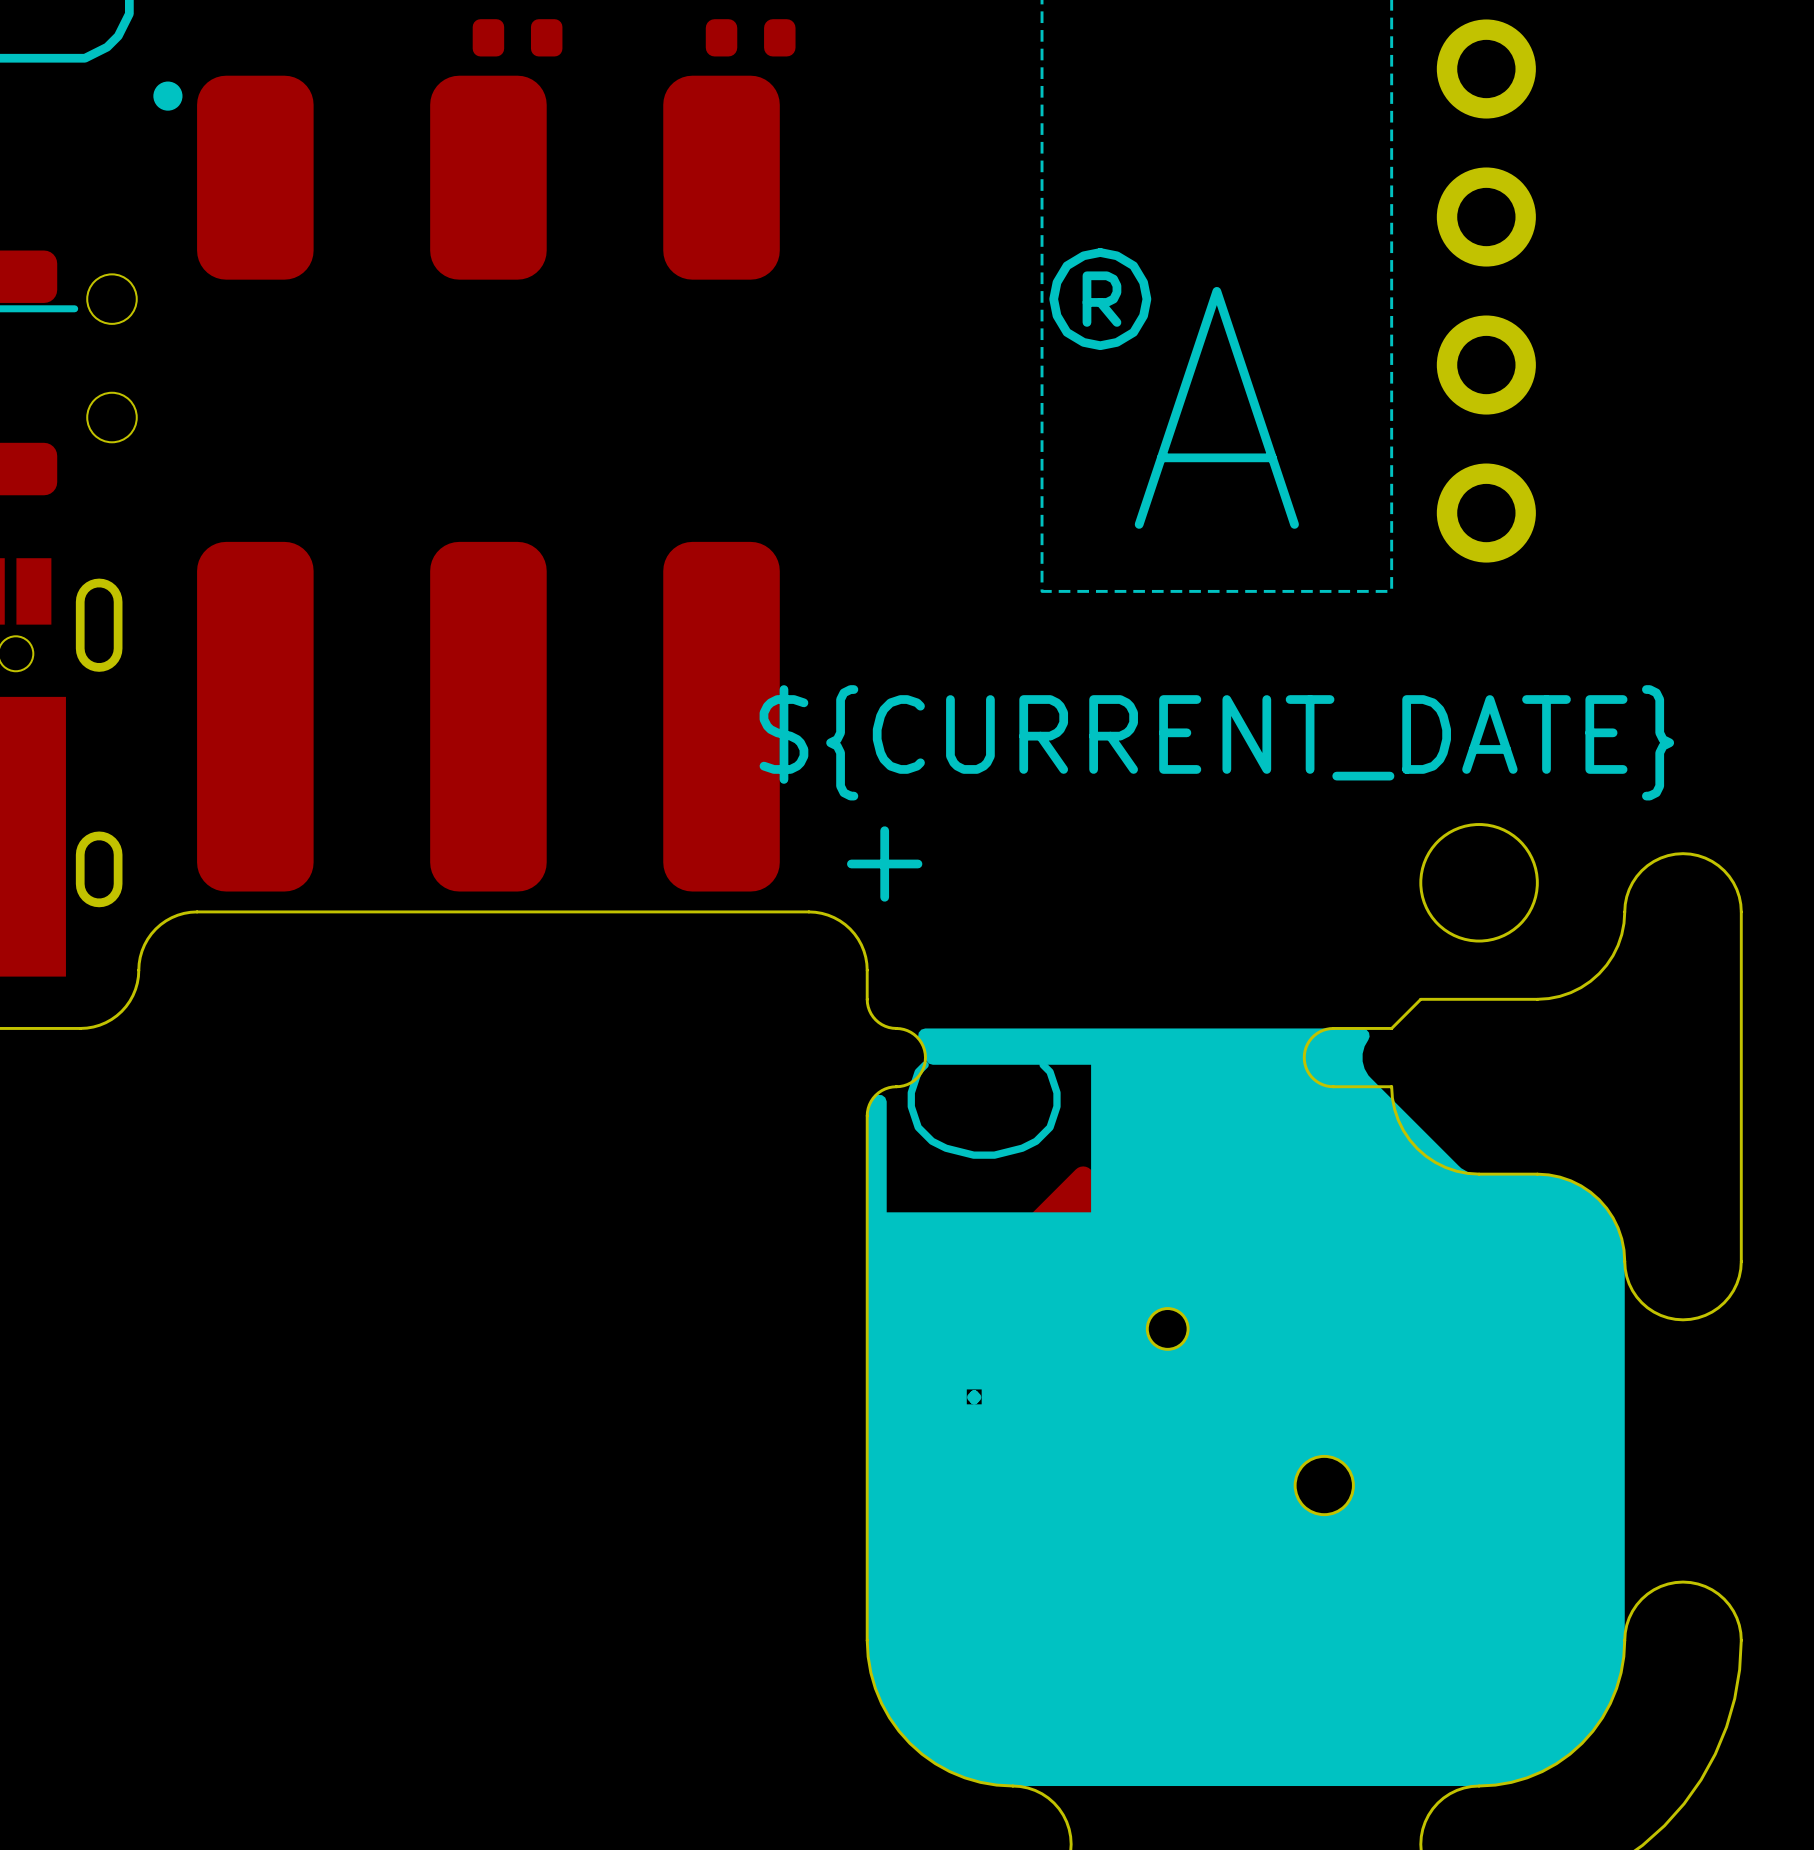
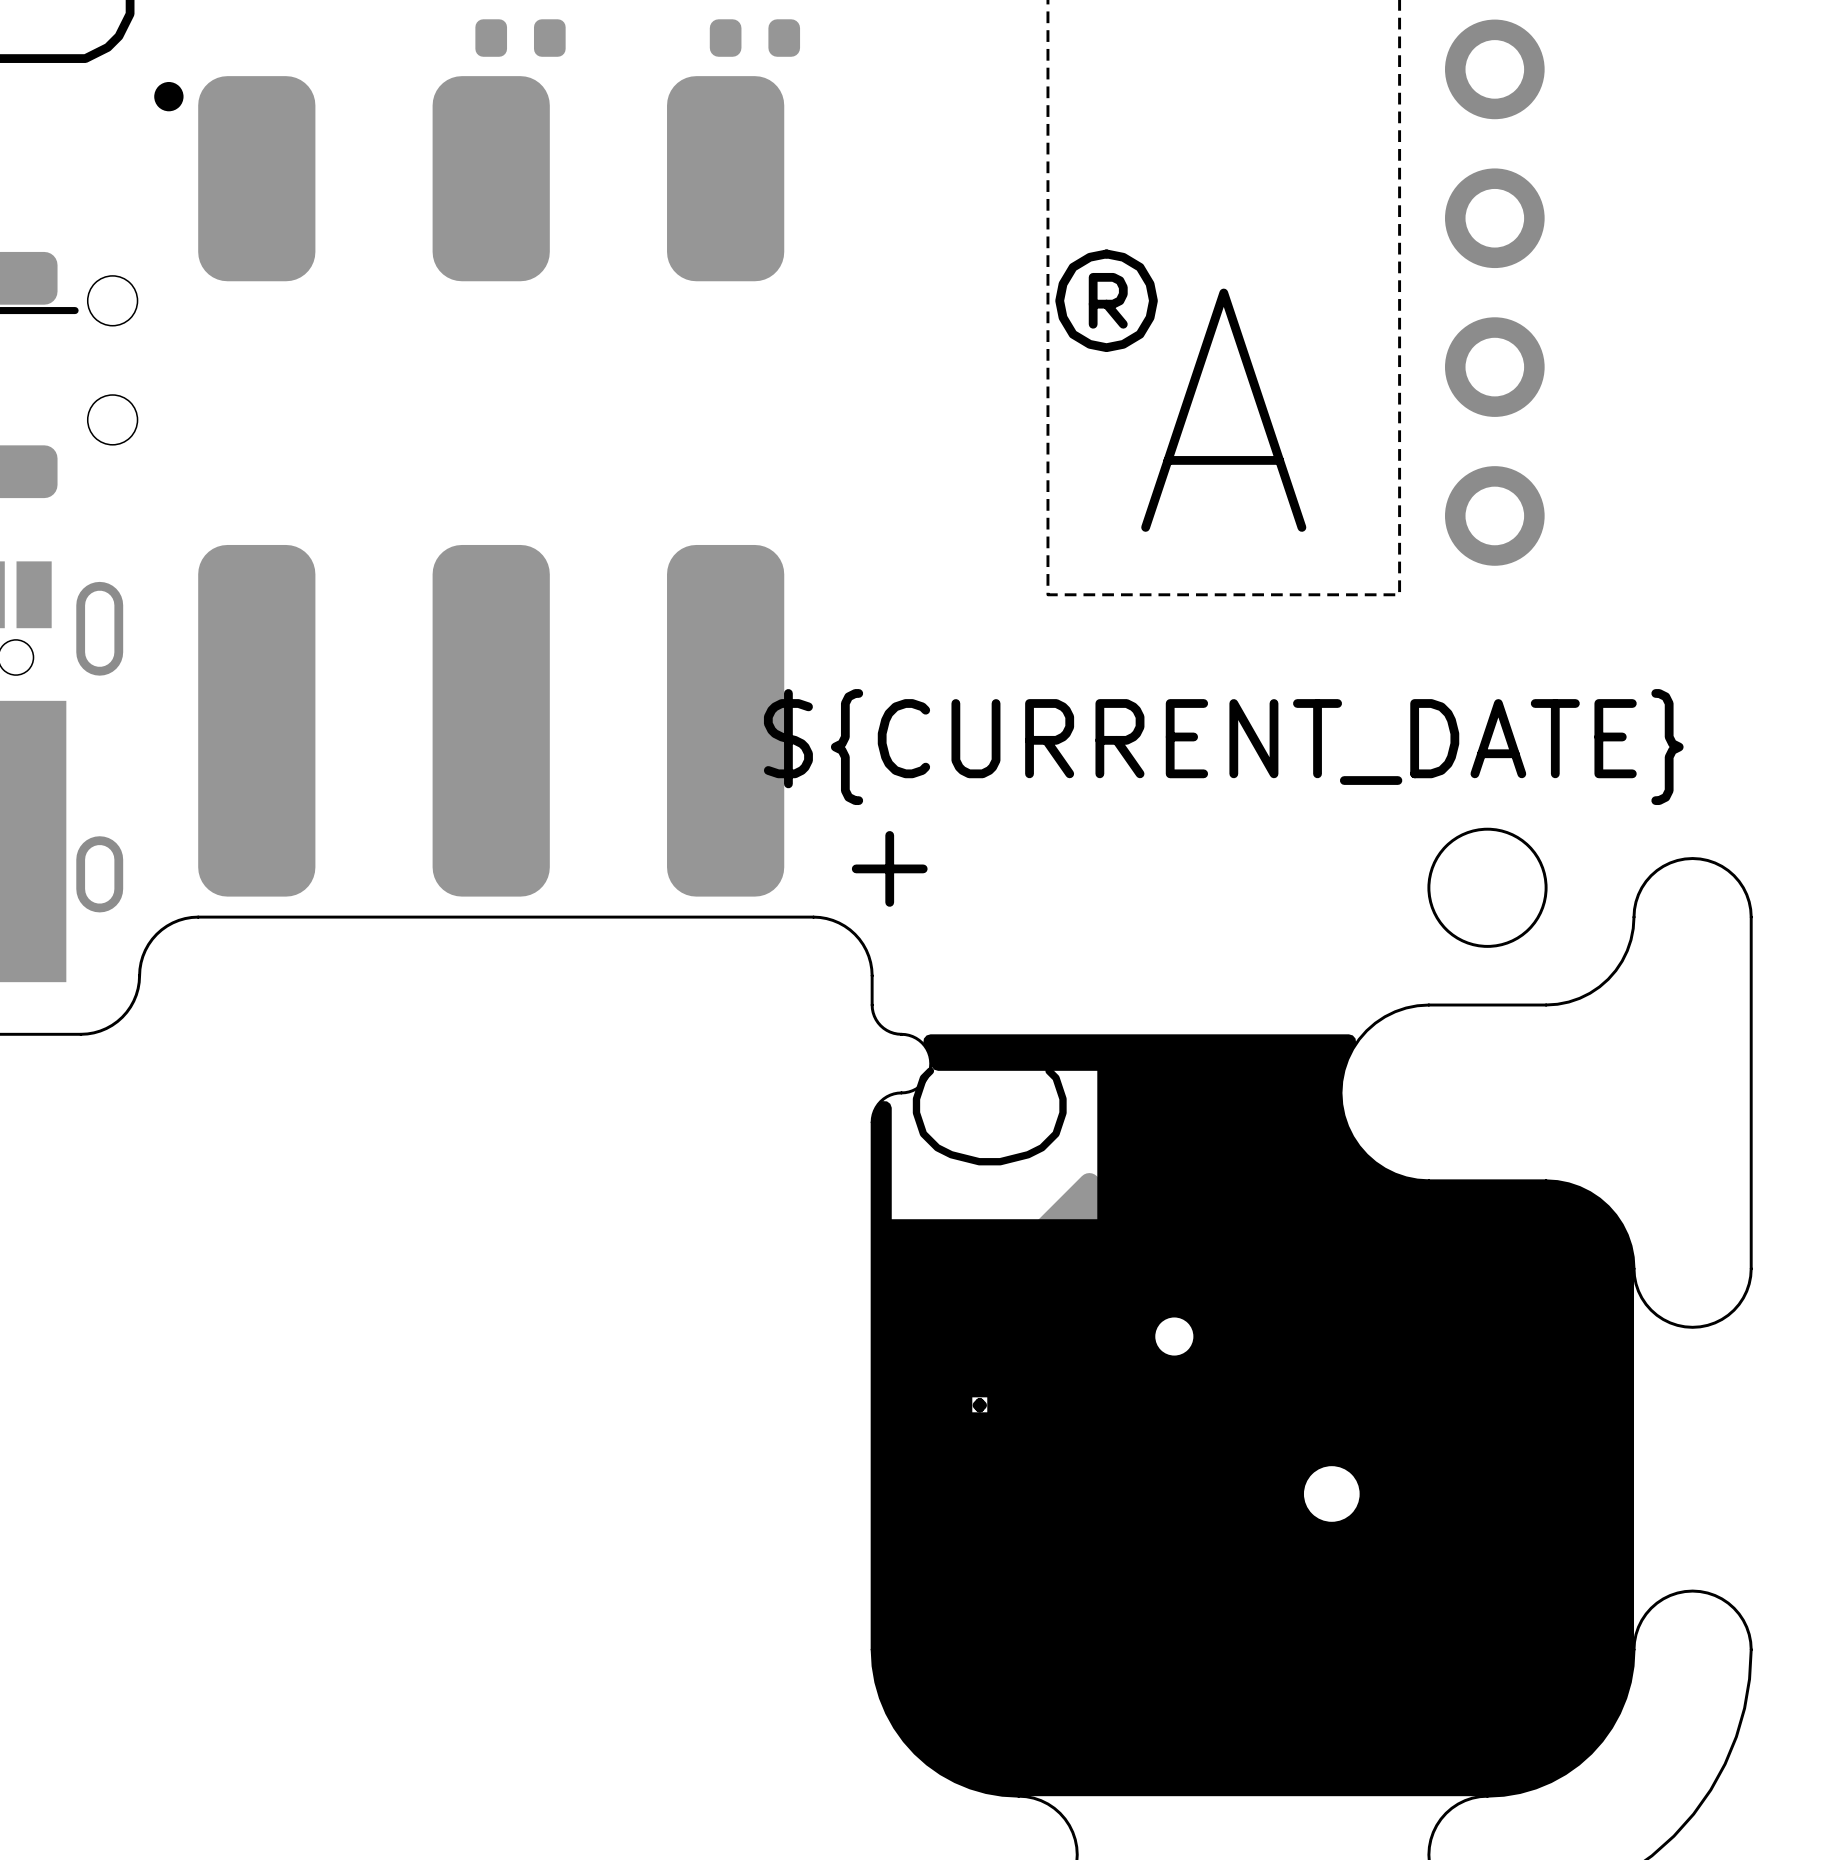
board edge: (1420, 999) (1391, 1028) (1333, 1028) (1319, 1031) (1311, 1038) (1306, 1047) (1304, 1057) (1306, 1067) (1314, 1079) (1326, 1085) (1391, 1086) (1398, 1120) (1417, 1148) (1445, 1167) (1479, 1174) -> (1428, 1005) (1417, 1005) (1395, 1011) (1375, 1023) (1359, 1039) (1347, 1059) (1341, 1081) (1341, 1104) (1343, 1115) (1347, 1126) (1359, 1146) (1375, 1162) (1395, 1174) (1417, 1180) (1487, 1180)
drawing shape: [867, 1028, 1625, 1787] -> [872, 1034, 1635, 1797]

